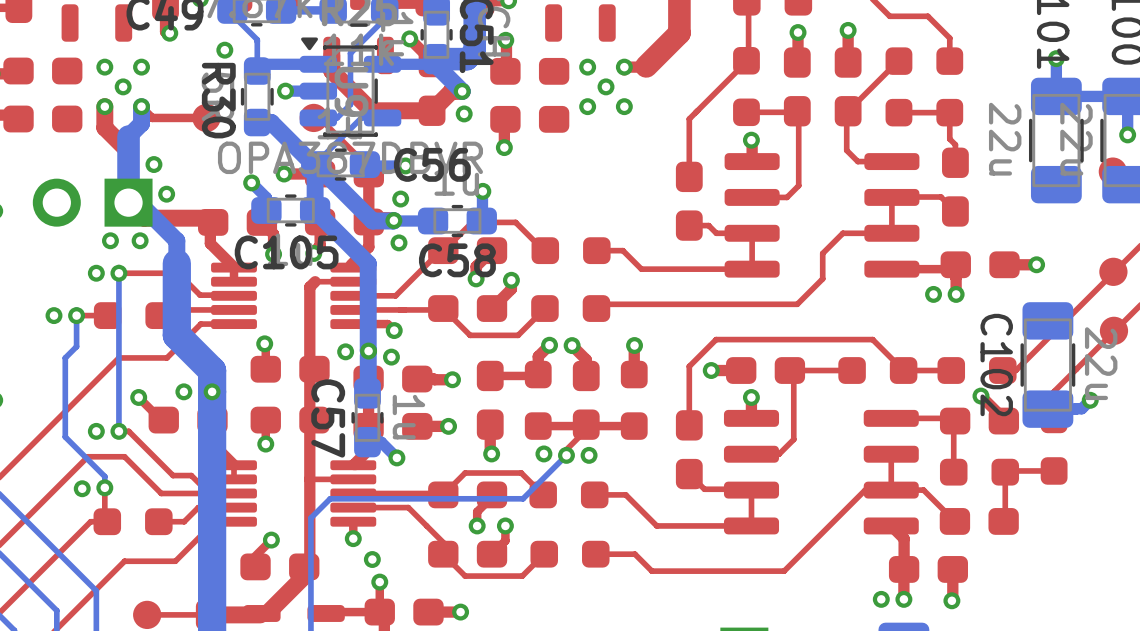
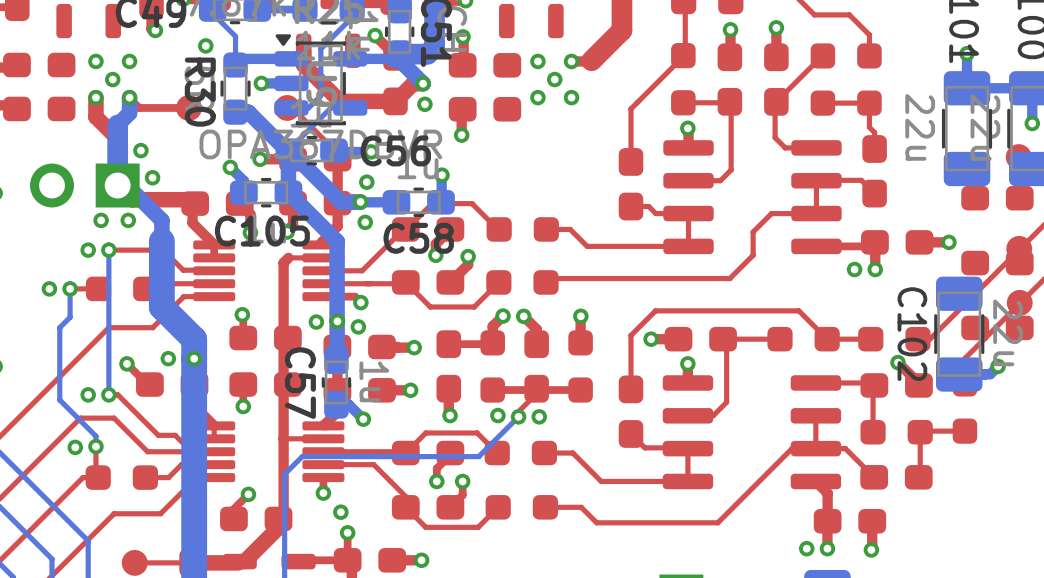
part: none -> (997, 198)
part: none -> (997, 263)
part: none -> (997, 327)

